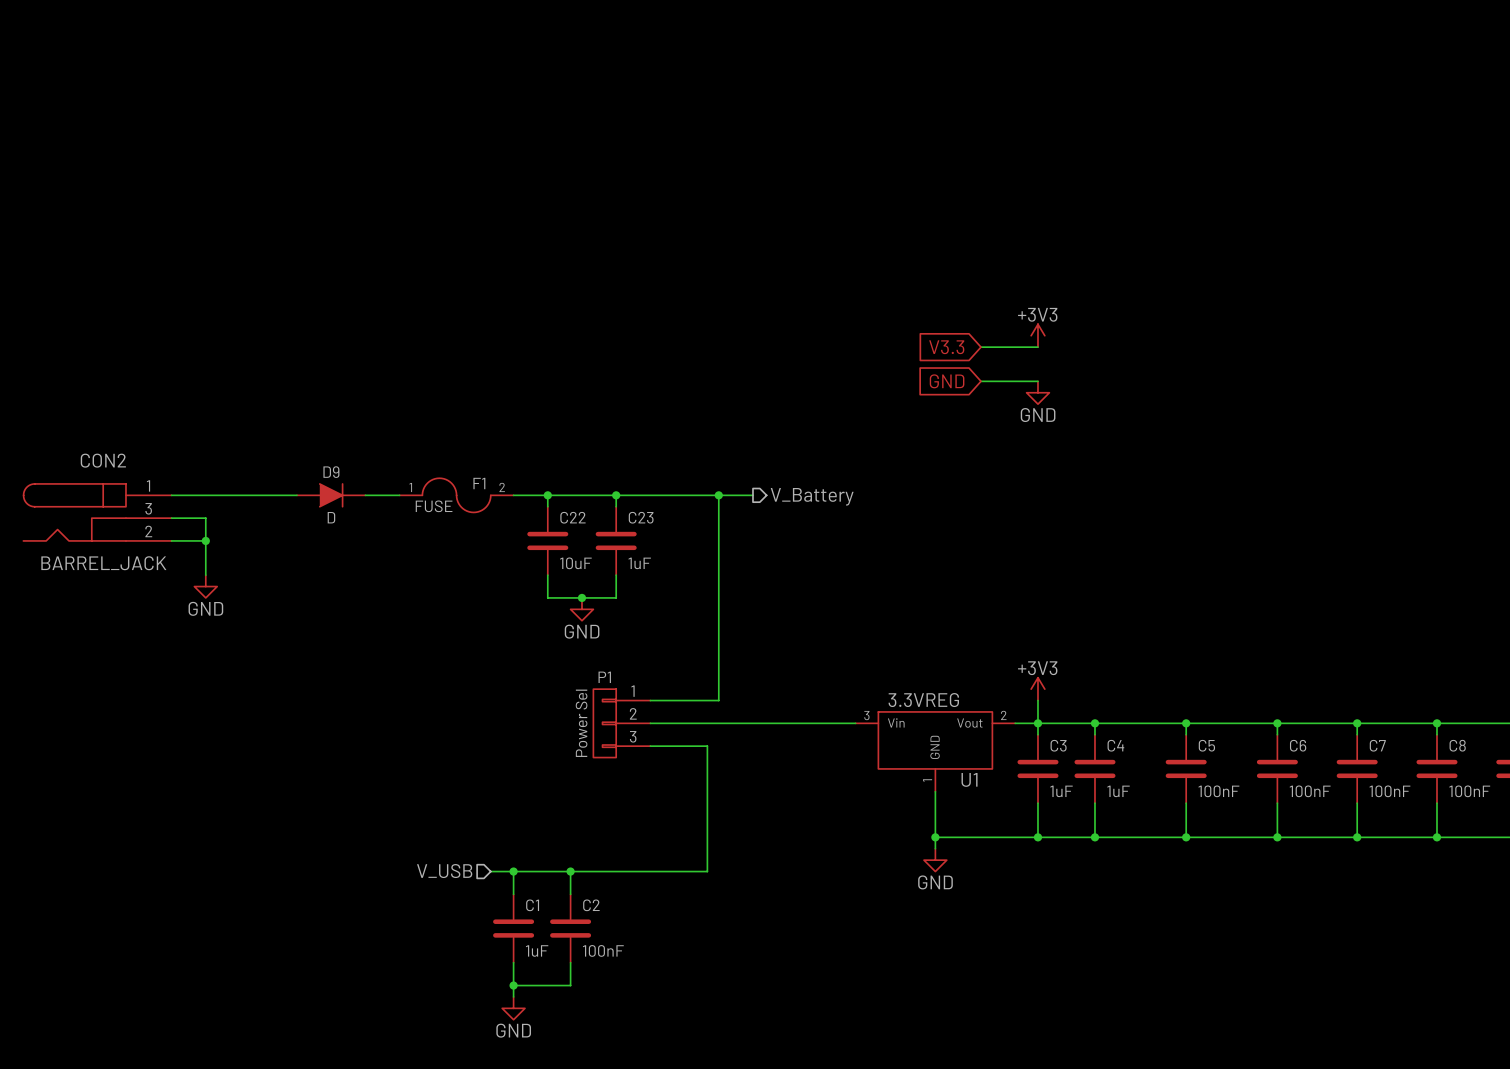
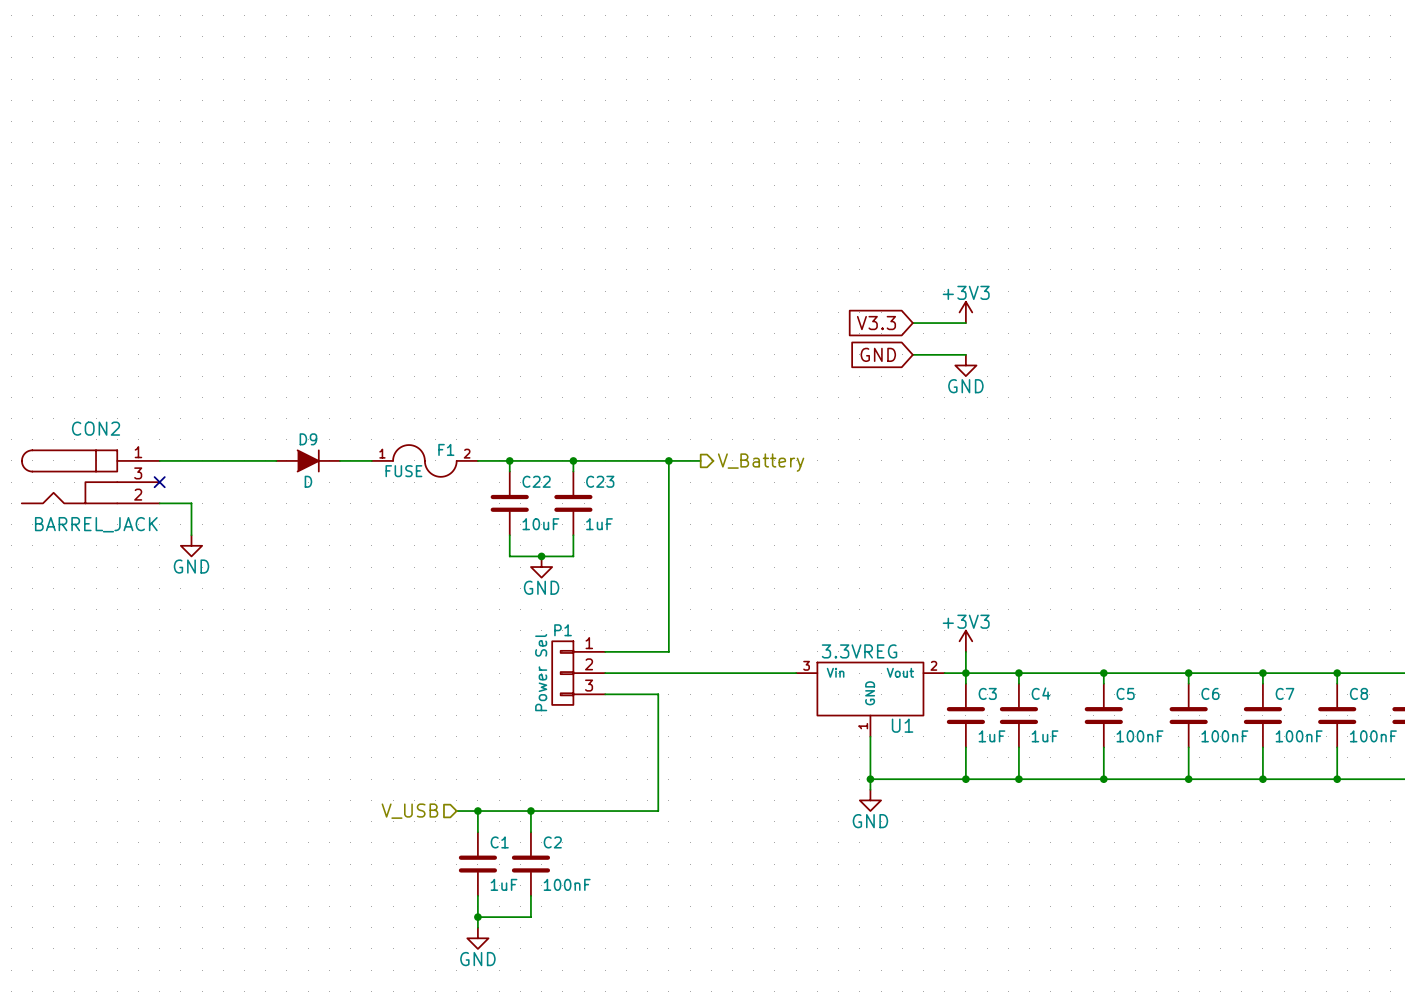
wire: (171, 518) (205, 518) (205, 540) -> none
no-connect mark: none -> (159, 482)
junction: (205, 540) -> none

